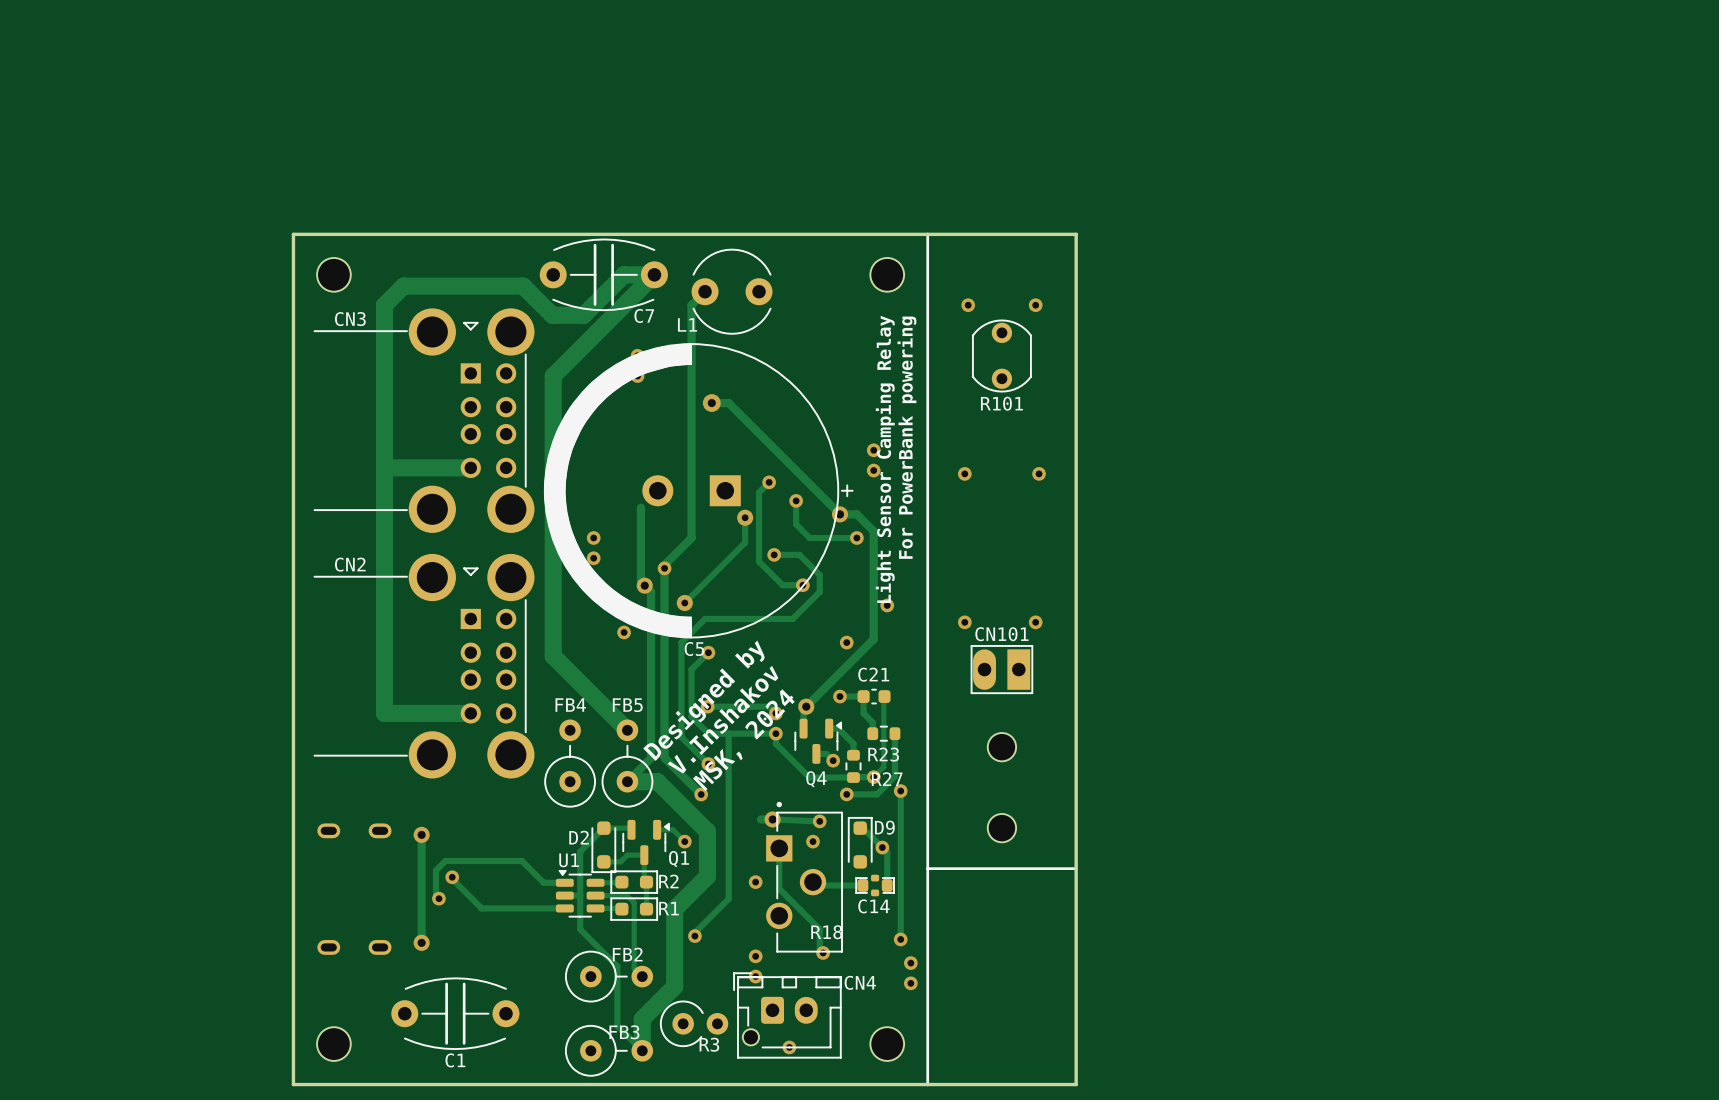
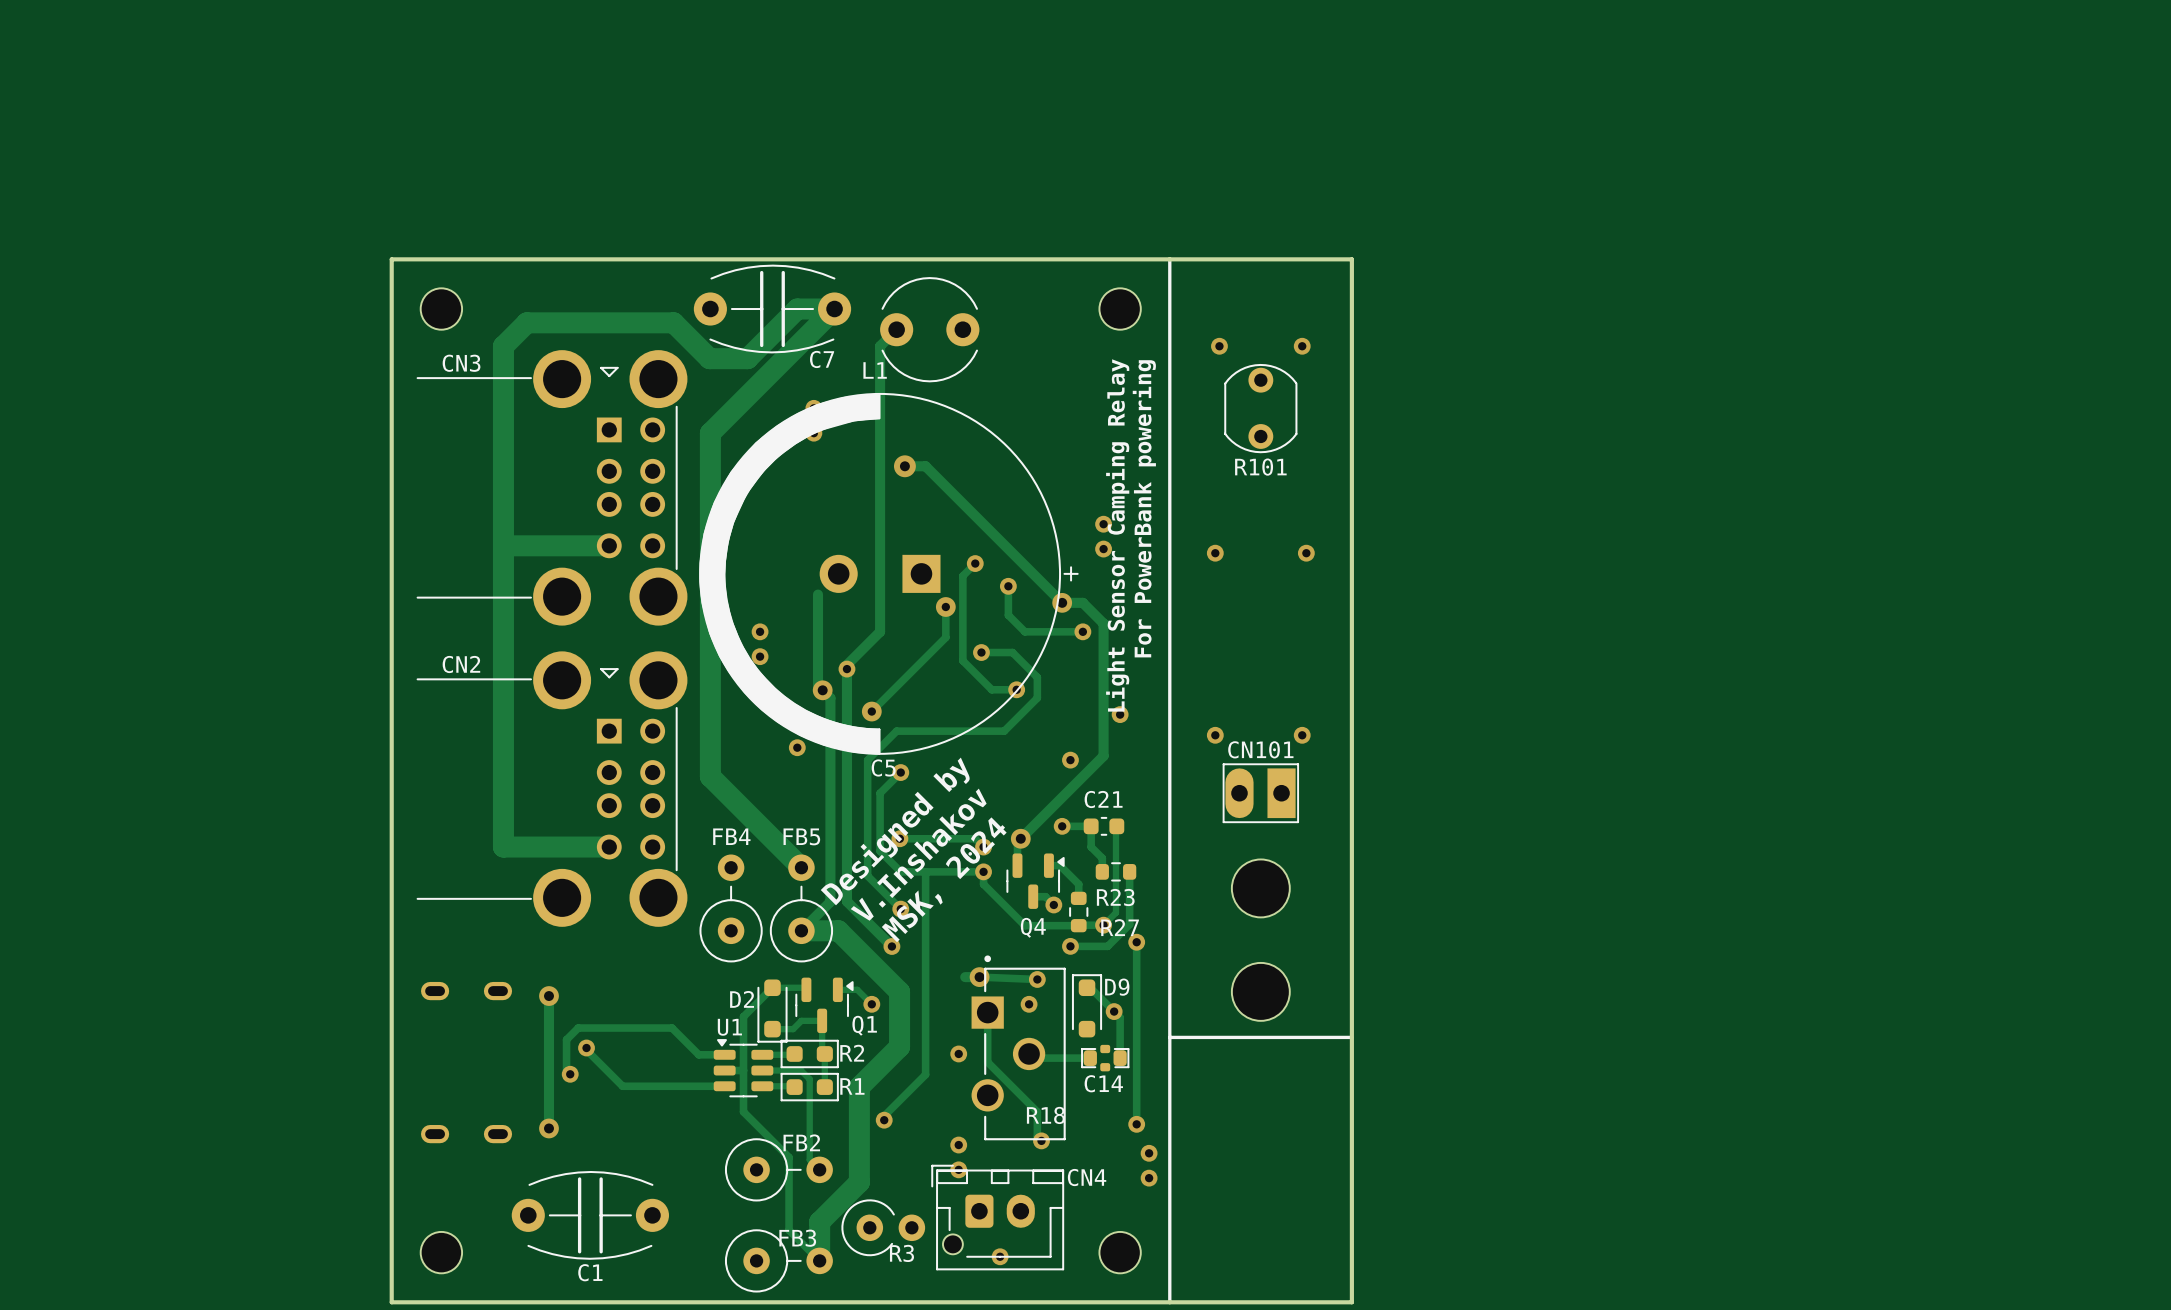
part footprint: [987, 733, 1017, 762] -> [1231, 859, 1290, 918]
part footprint: [987, 813, 1017, 843] -> [1231, 962, 1290, 1021]

